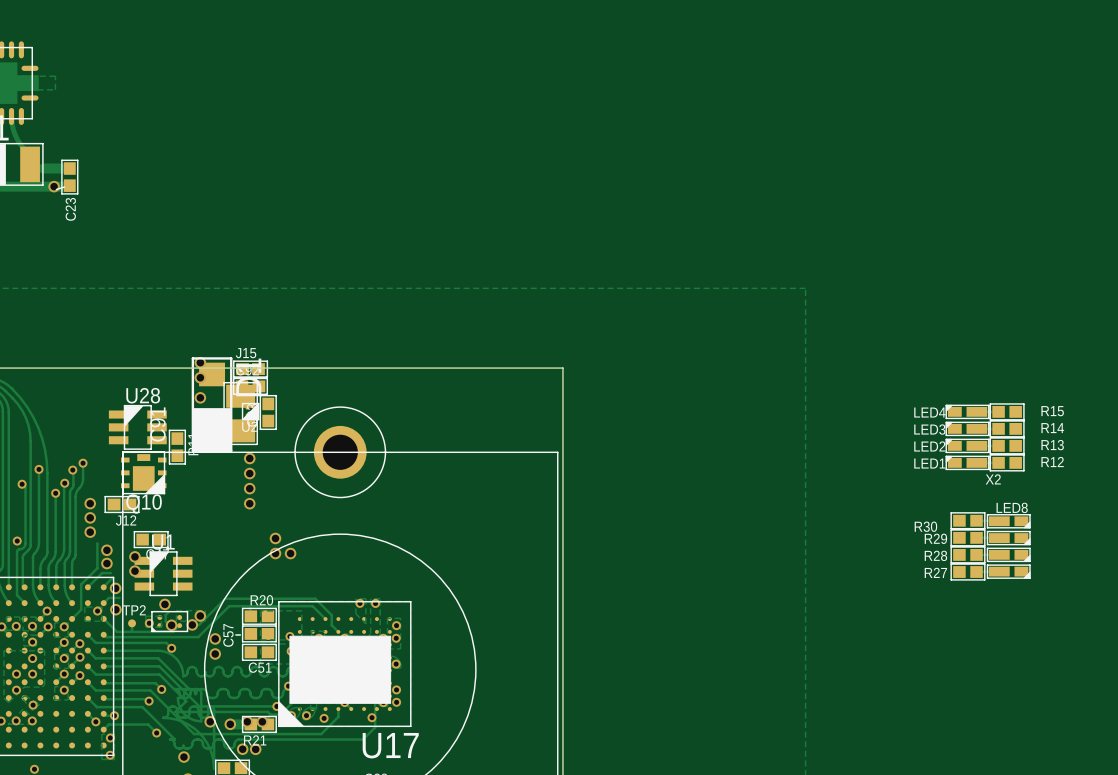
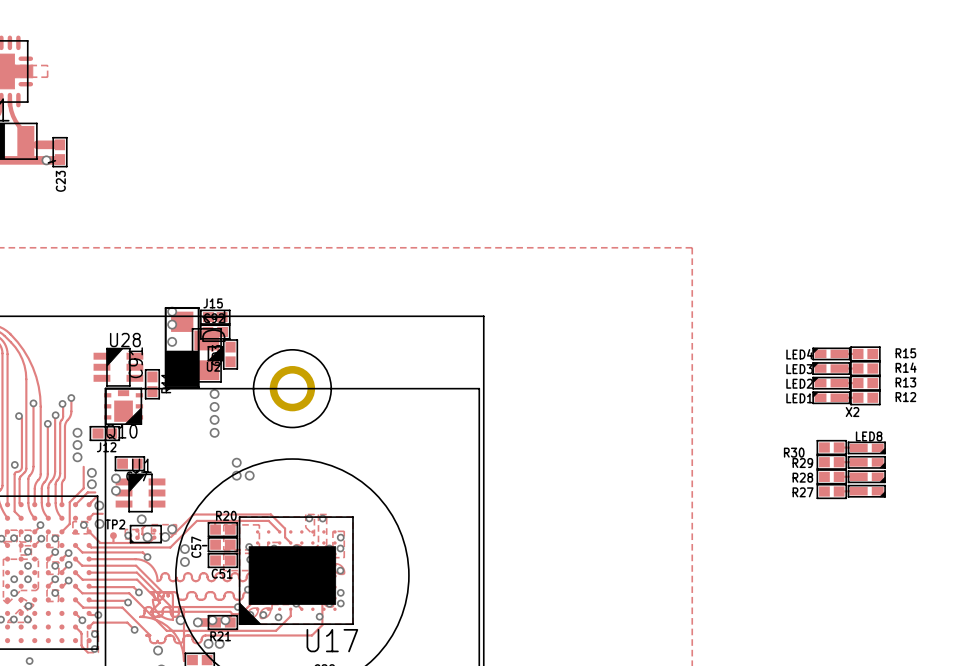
track: none -> (75, 627) (81, 633) (81, 646) (87, 652)

